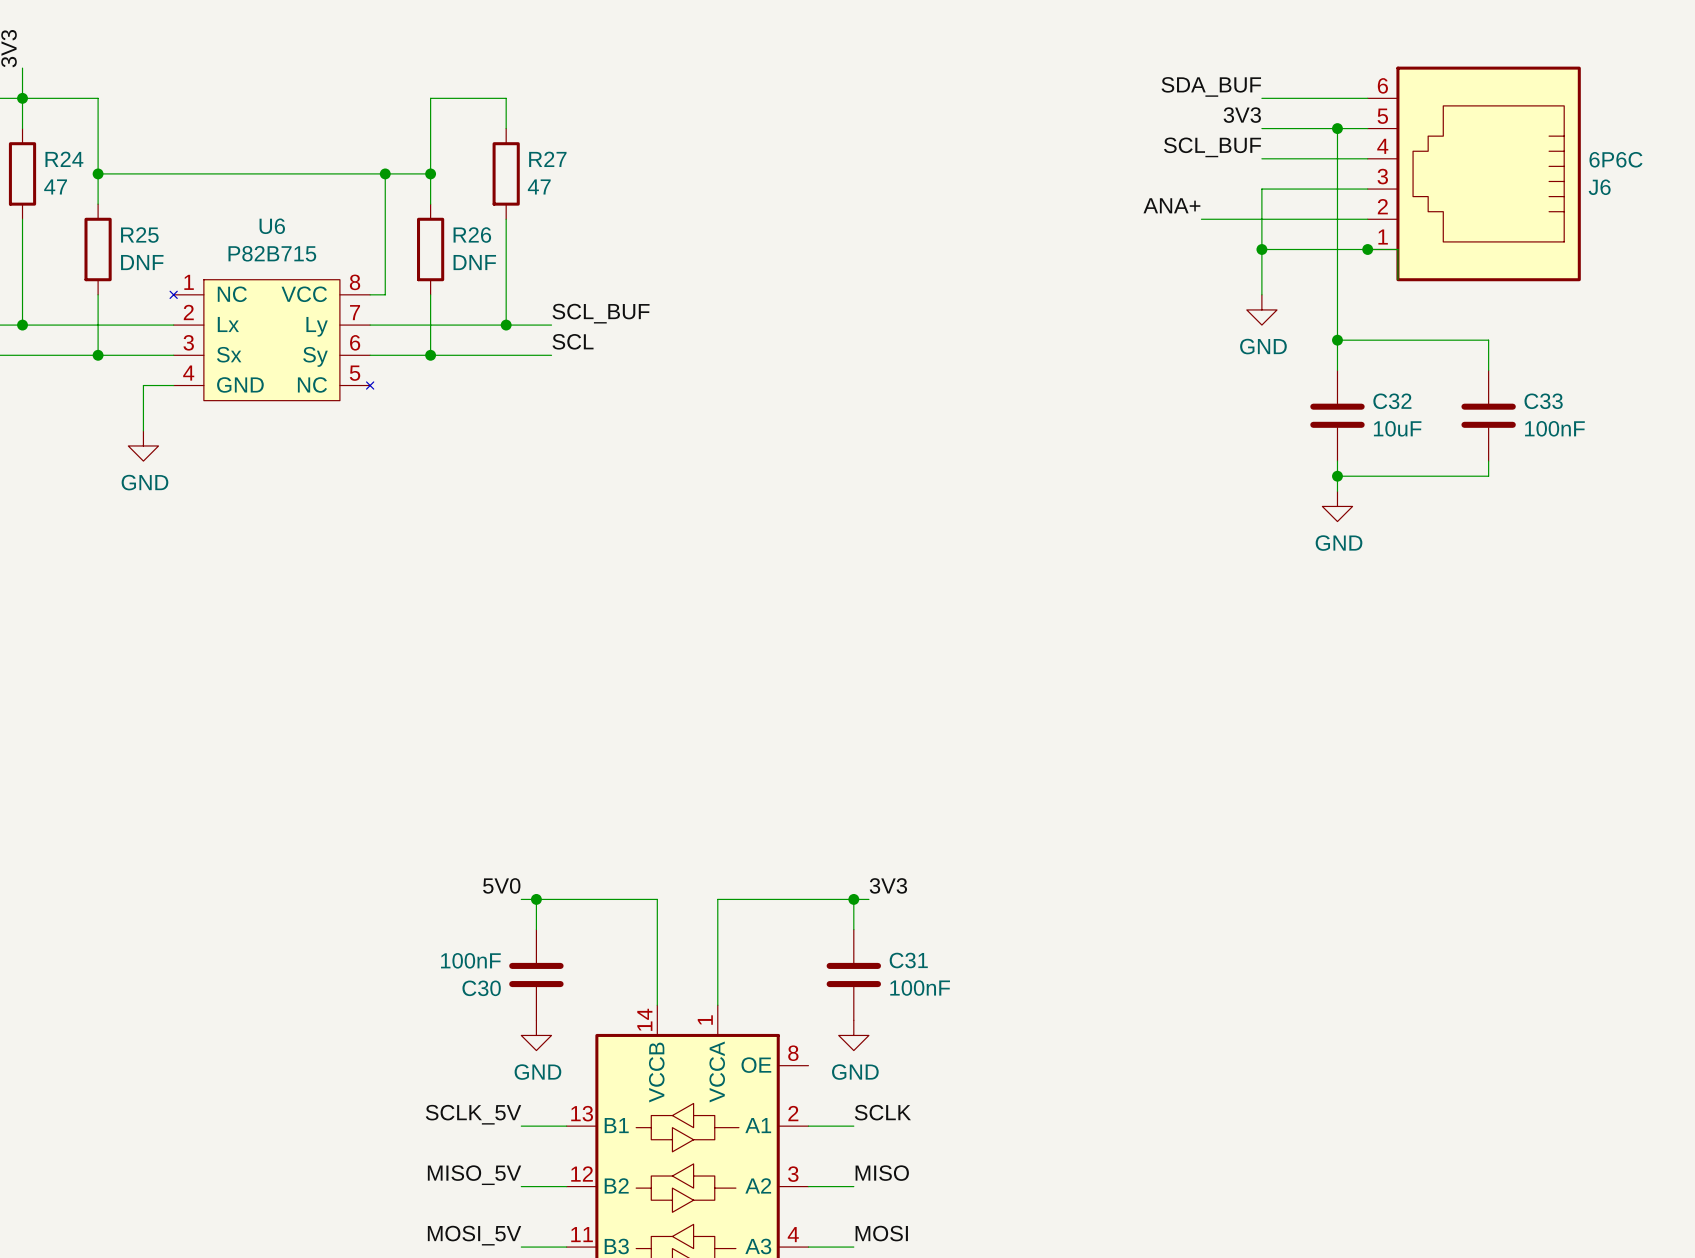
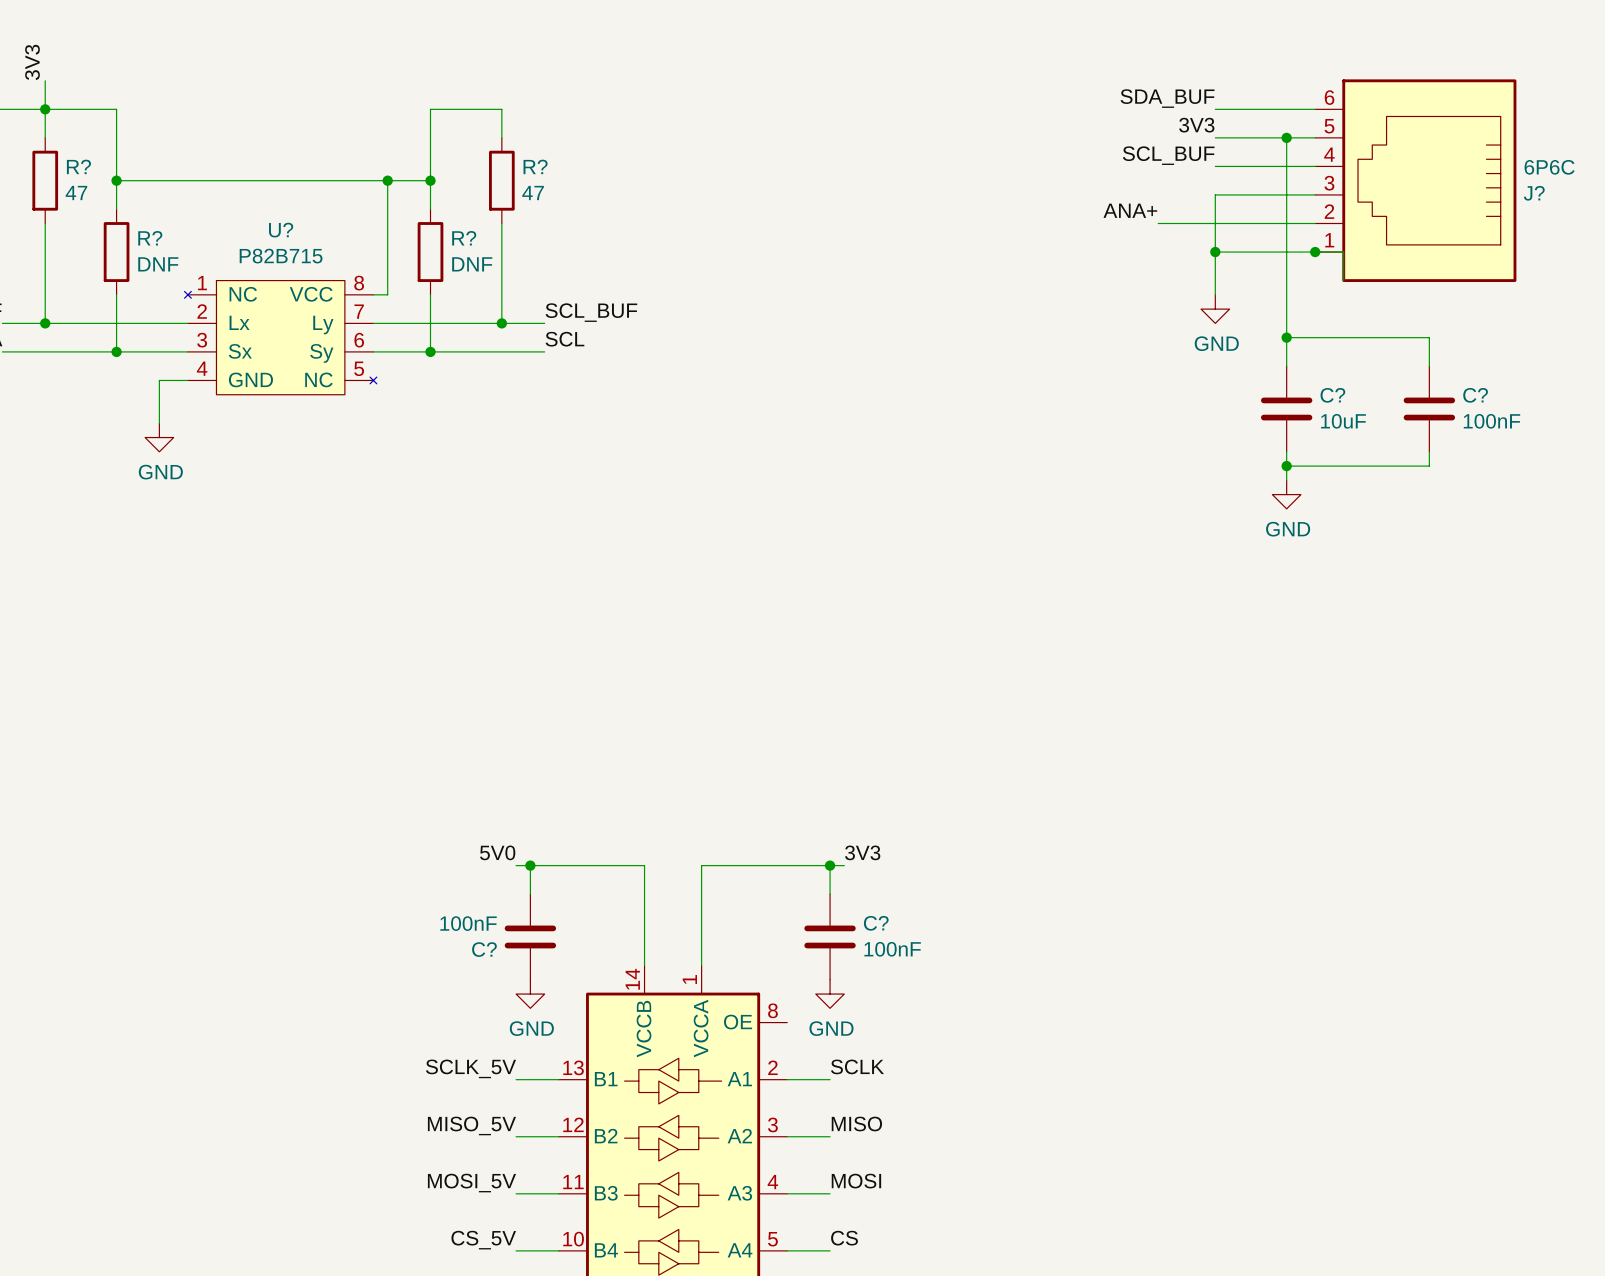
R24 name: R24 (64, 159) -> R? (78, 166)
R27 name: R27 (547, 159) -> R? (535, 166)
J6 name: J6 (1599, 187) -> J? (1534, 193)
U6 name: U6 (272, 226) -> U? (281, 230)
R25 name: R25 (139, 235) -> R? (150, 238)
R26 name: R26 (472, 235) -> R? (464, 238)
C32 name: C32 (1392, 401) -> C? (1332, 395)
C33 name: C33 (1543, 401) -> C? (1475, 395)
C31 name: C31 (908, 960) -> C? (876, 923)
C30 name: C30 (481, 988) -> C? (484, 949)

